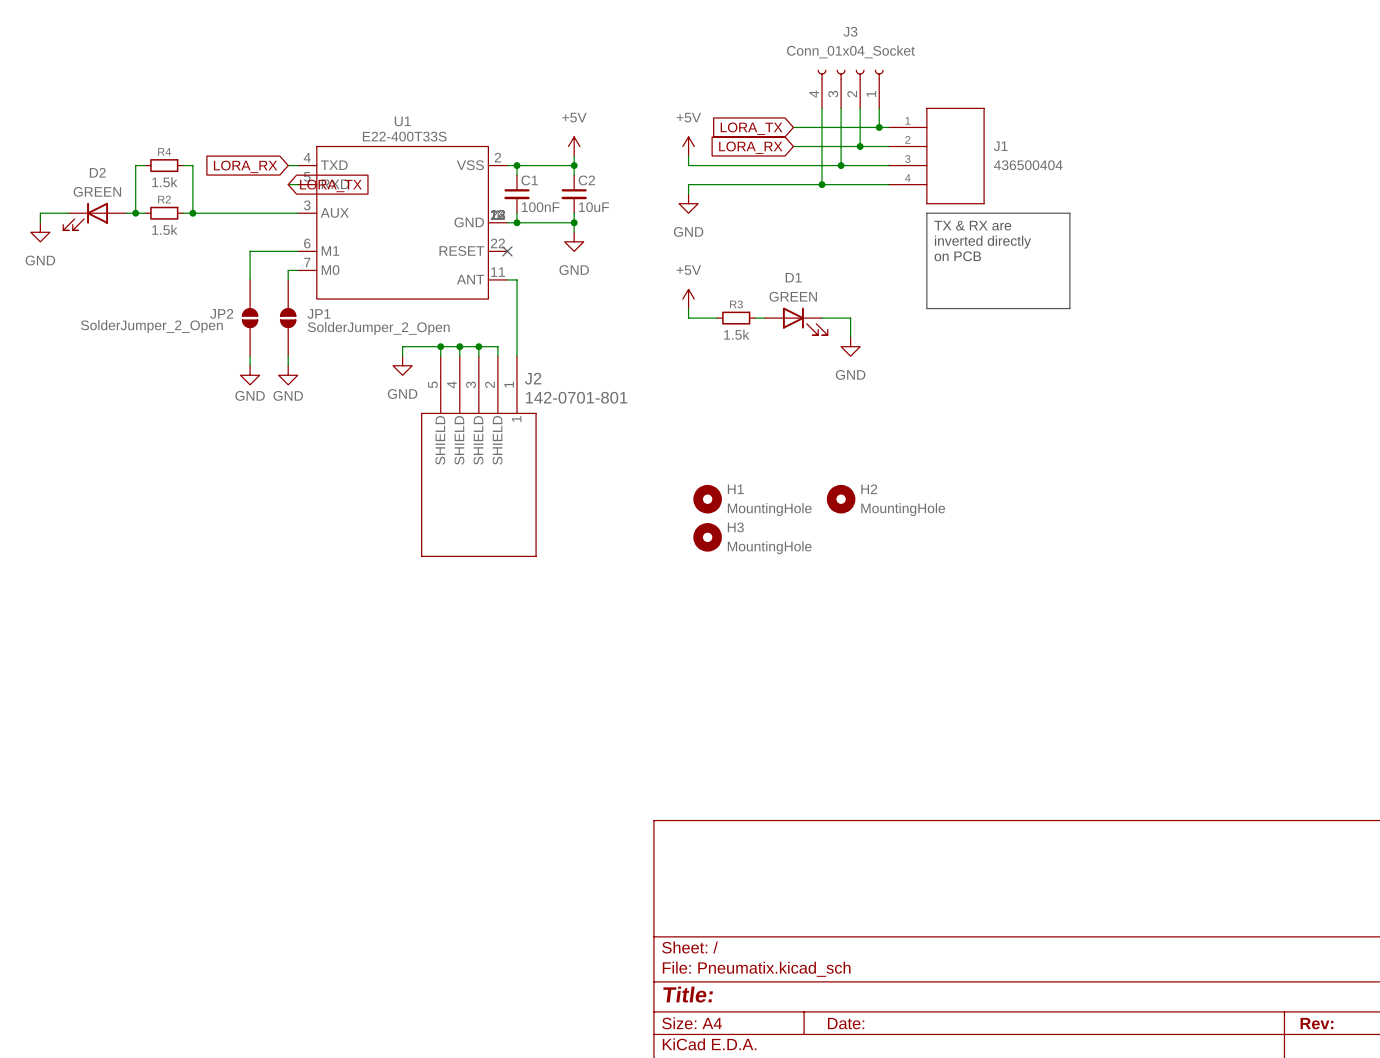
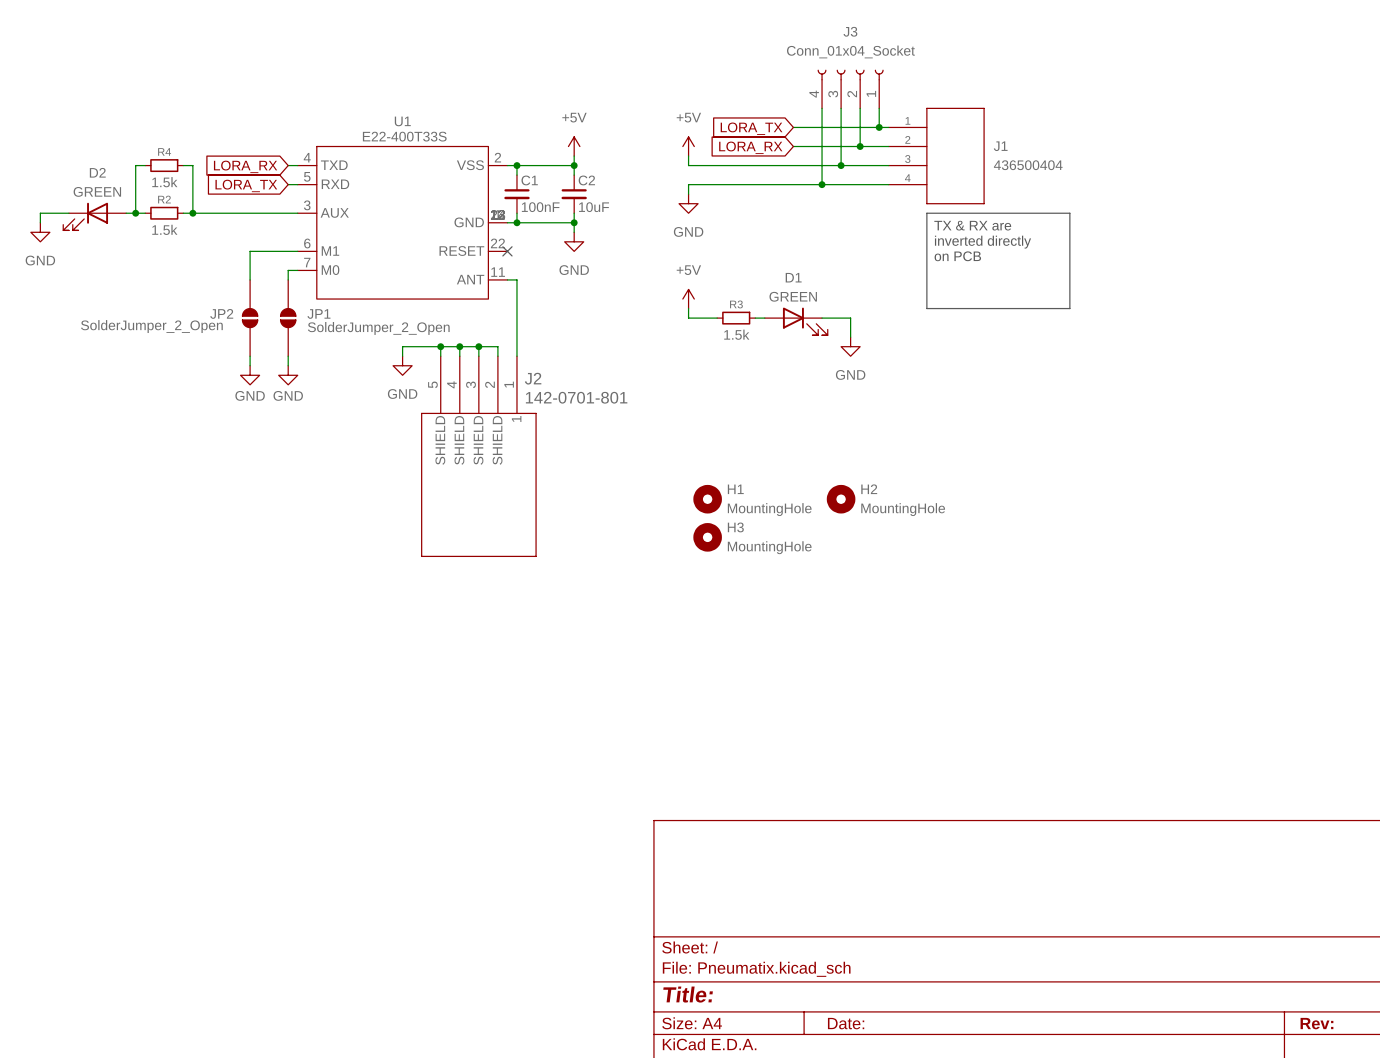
global label rotation: 0° (330, 185) -> 180° (246, 185)

